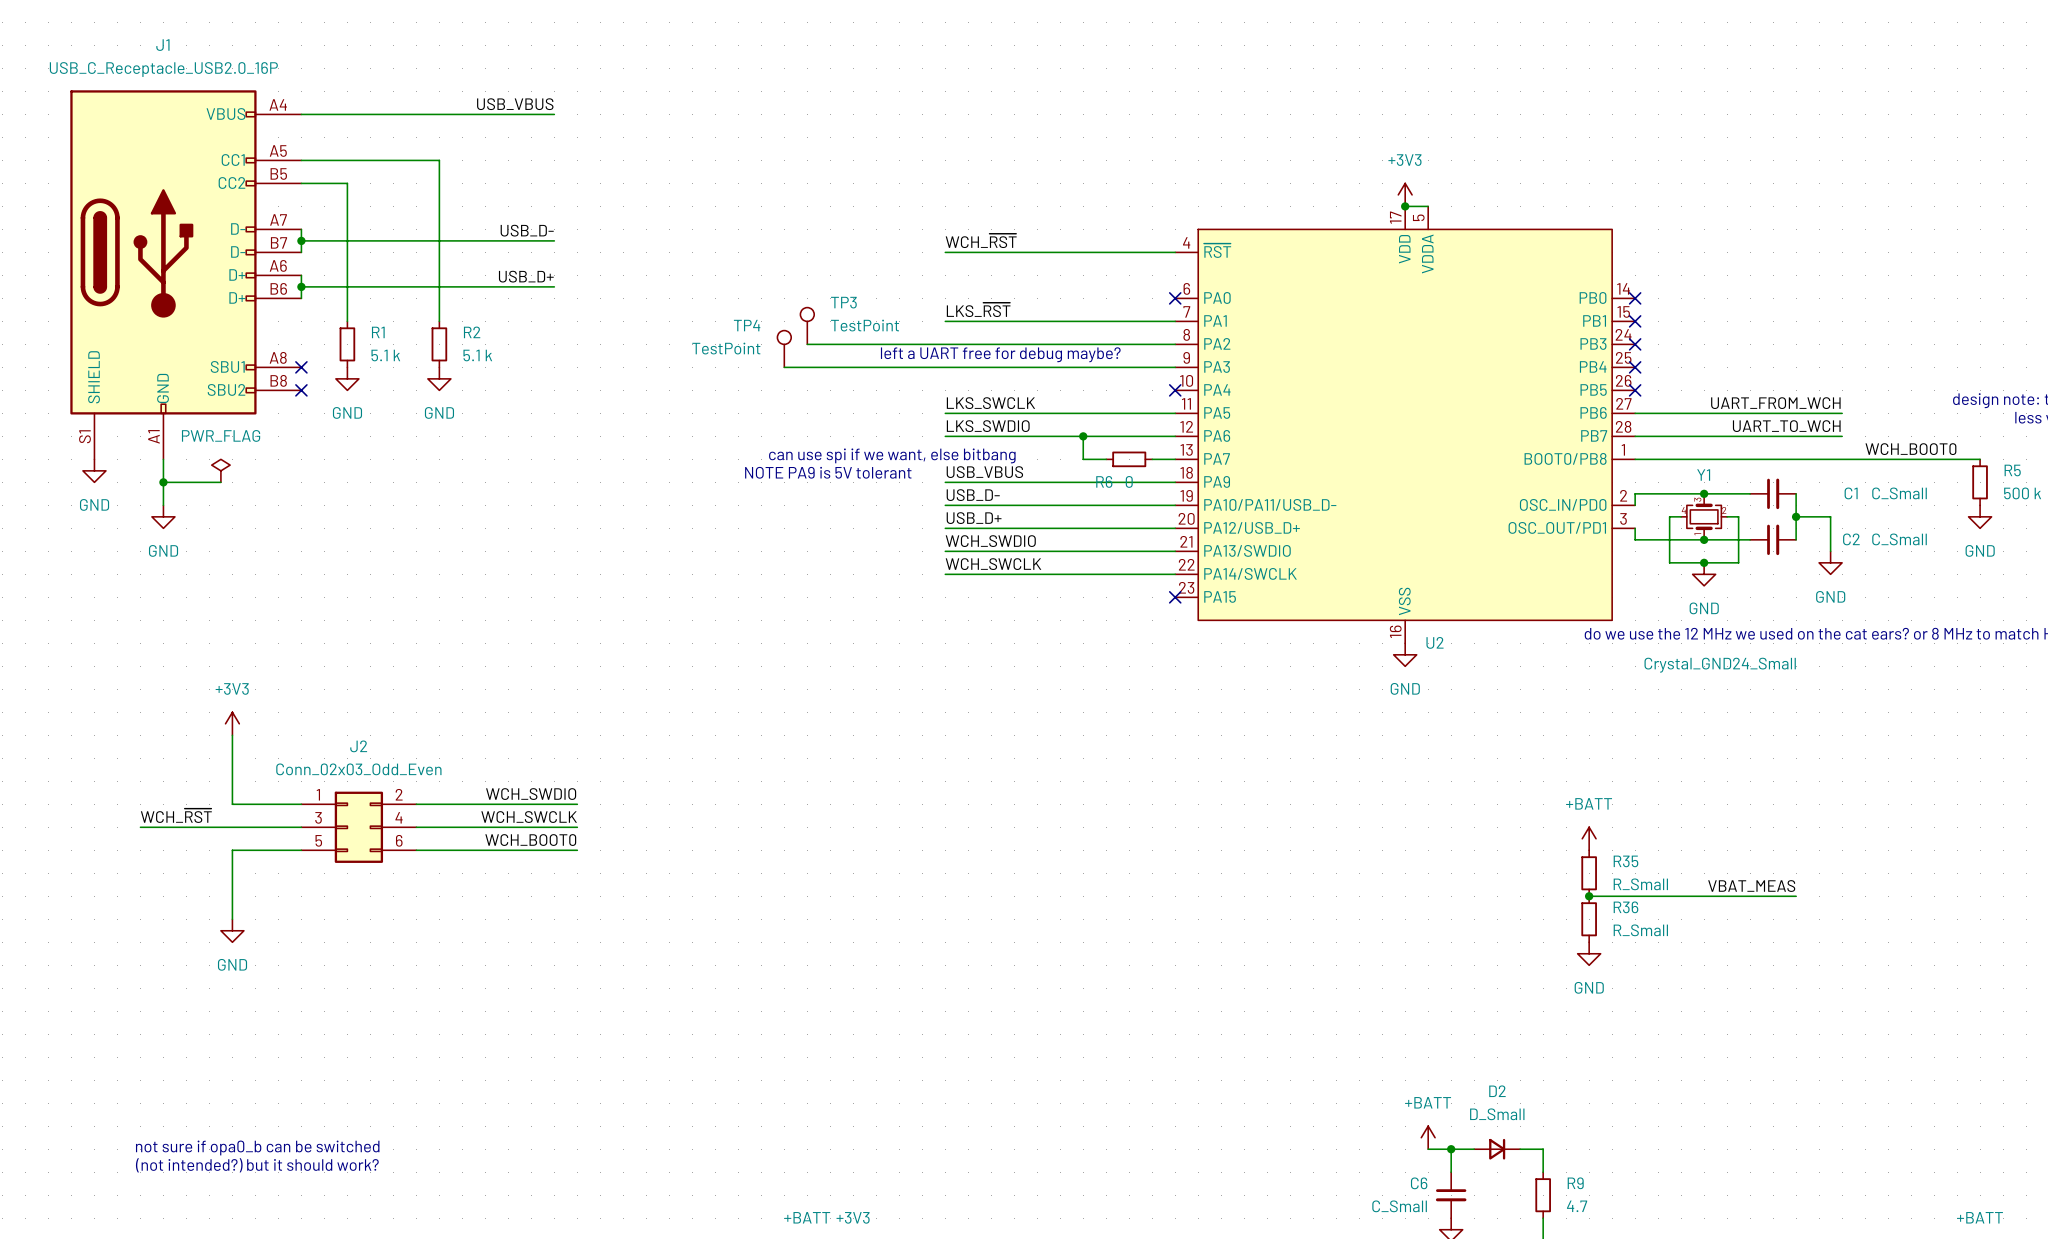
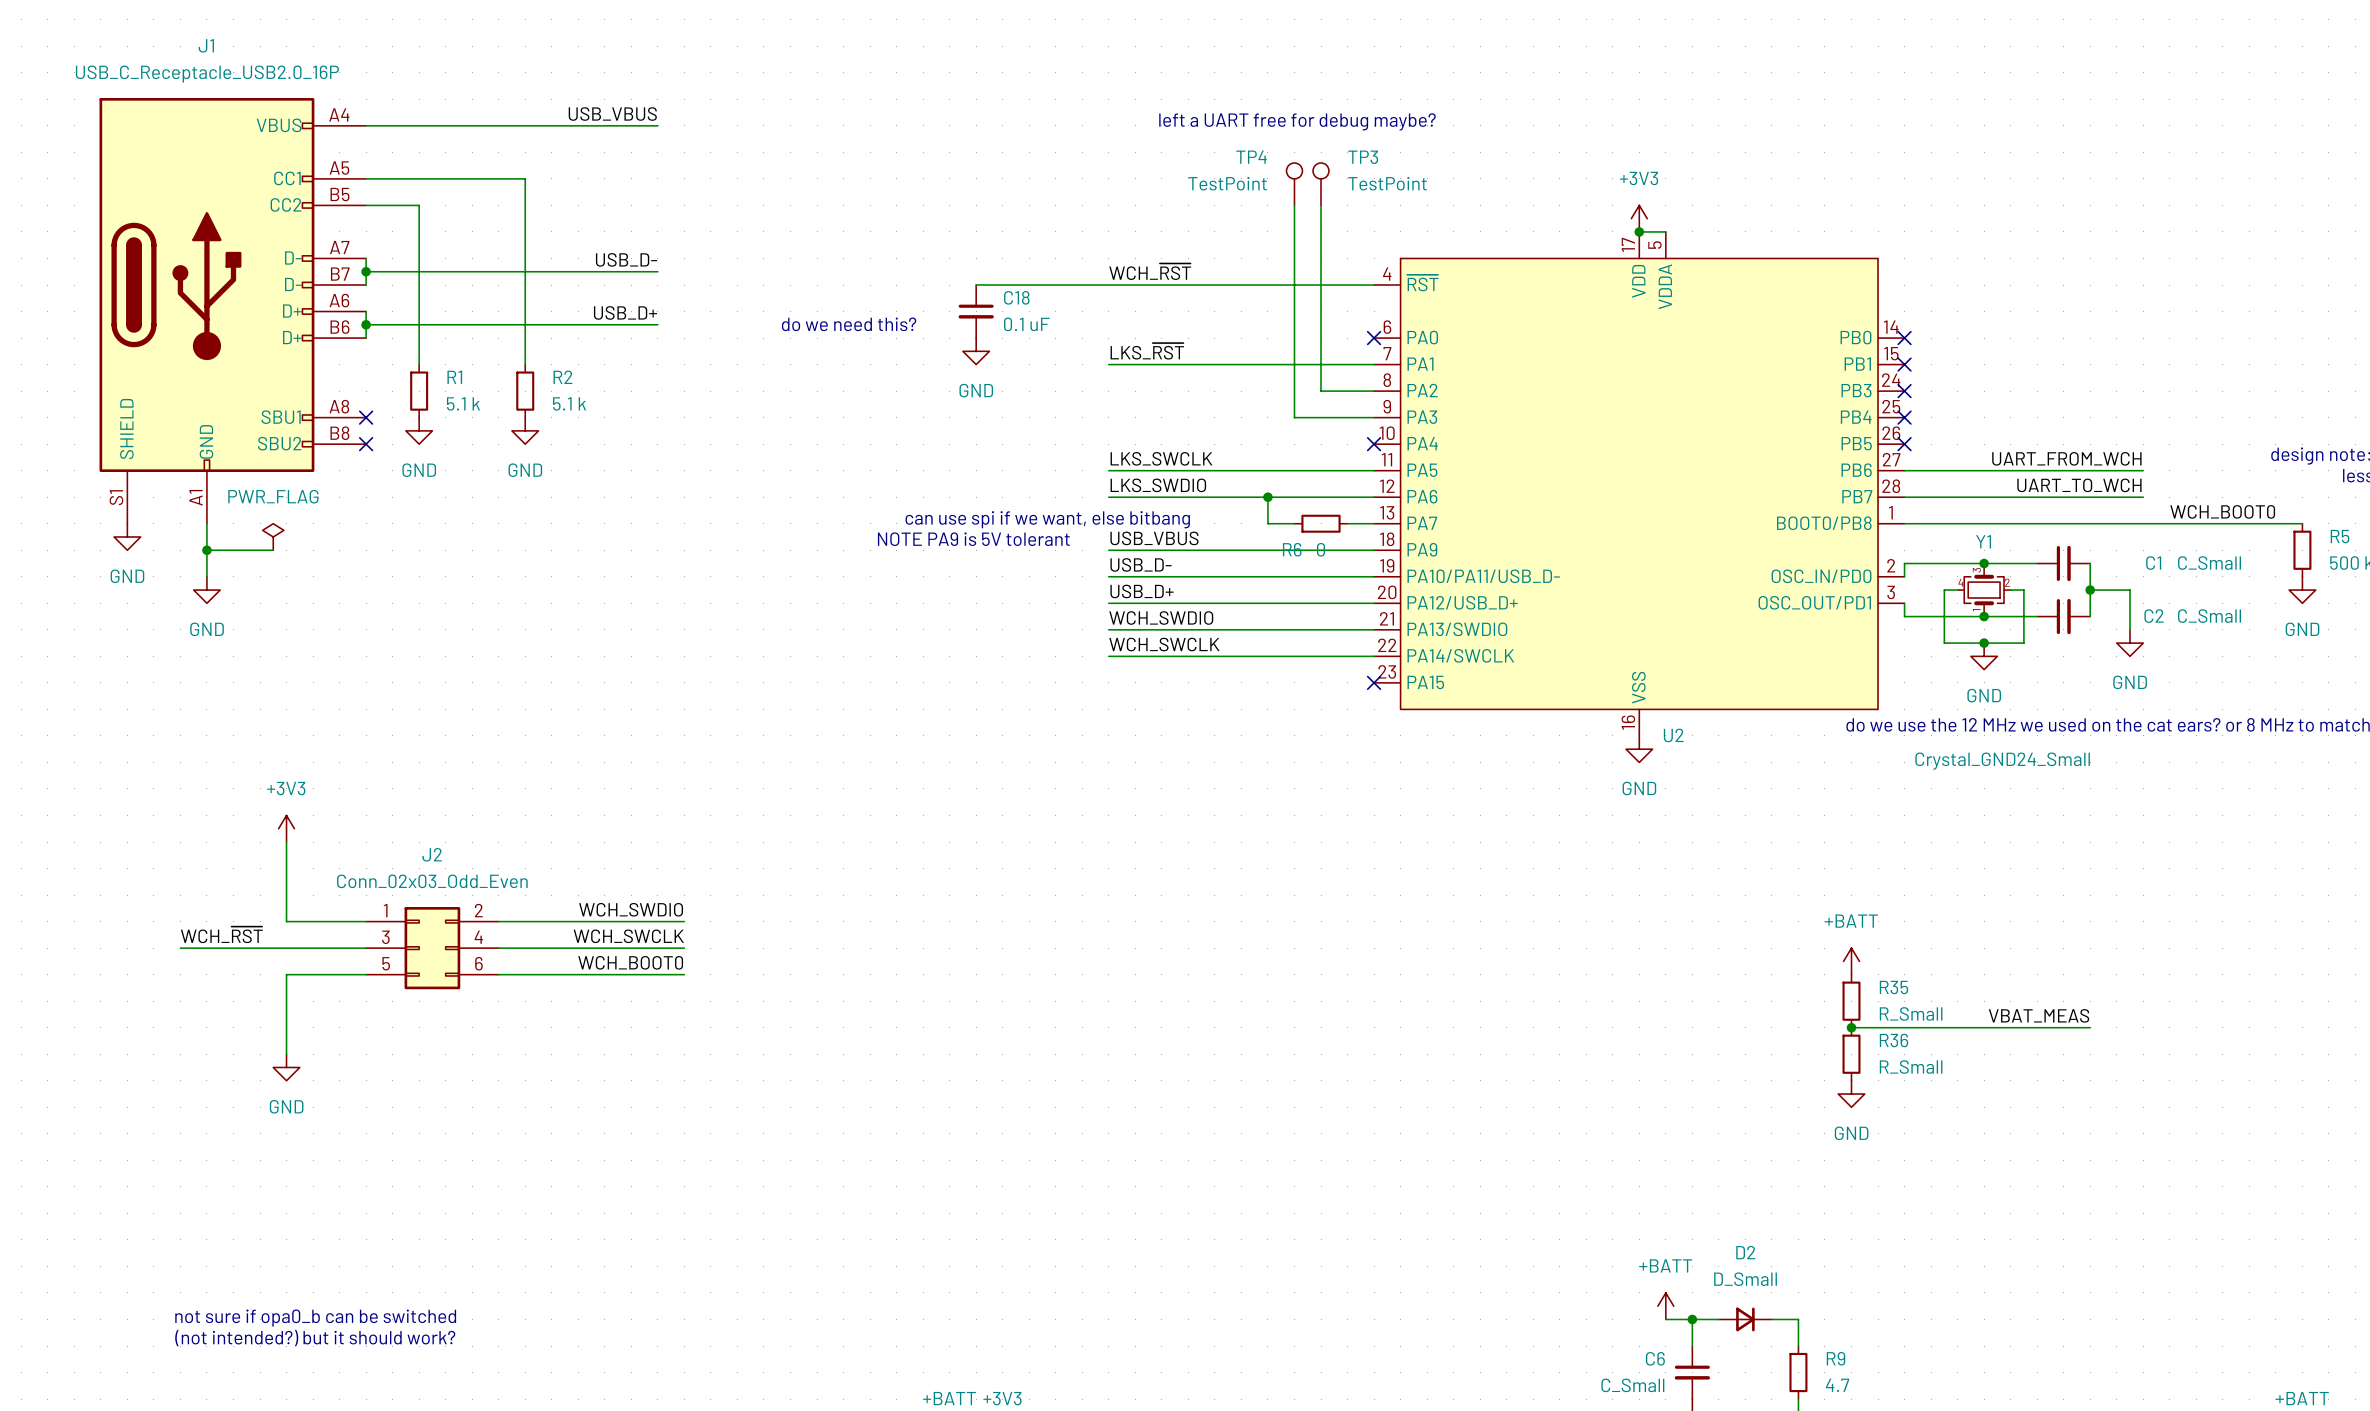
text: none -> left a UART free for debug maybe? (1297, 121)
wire: none -> (976, 285) (1108, 285)
C18: none -> 0.1 uF (976, 311)
text: none -> do we need this? (849, 324)
power symbol: none -> GND (976, 351)
TP3 position: (807, 325) -> (1321, 184)
wire: (807, 344) (1129, 344) -> (1321, 205) (1321, 391)
TP4 position: (784, 348) -> (1294, 184)
text: left a UART free for debug maybe? (1000, 354) -> none
wire: (784, 367) (1106, 367) -> (1294, 205) (1294, 417)

